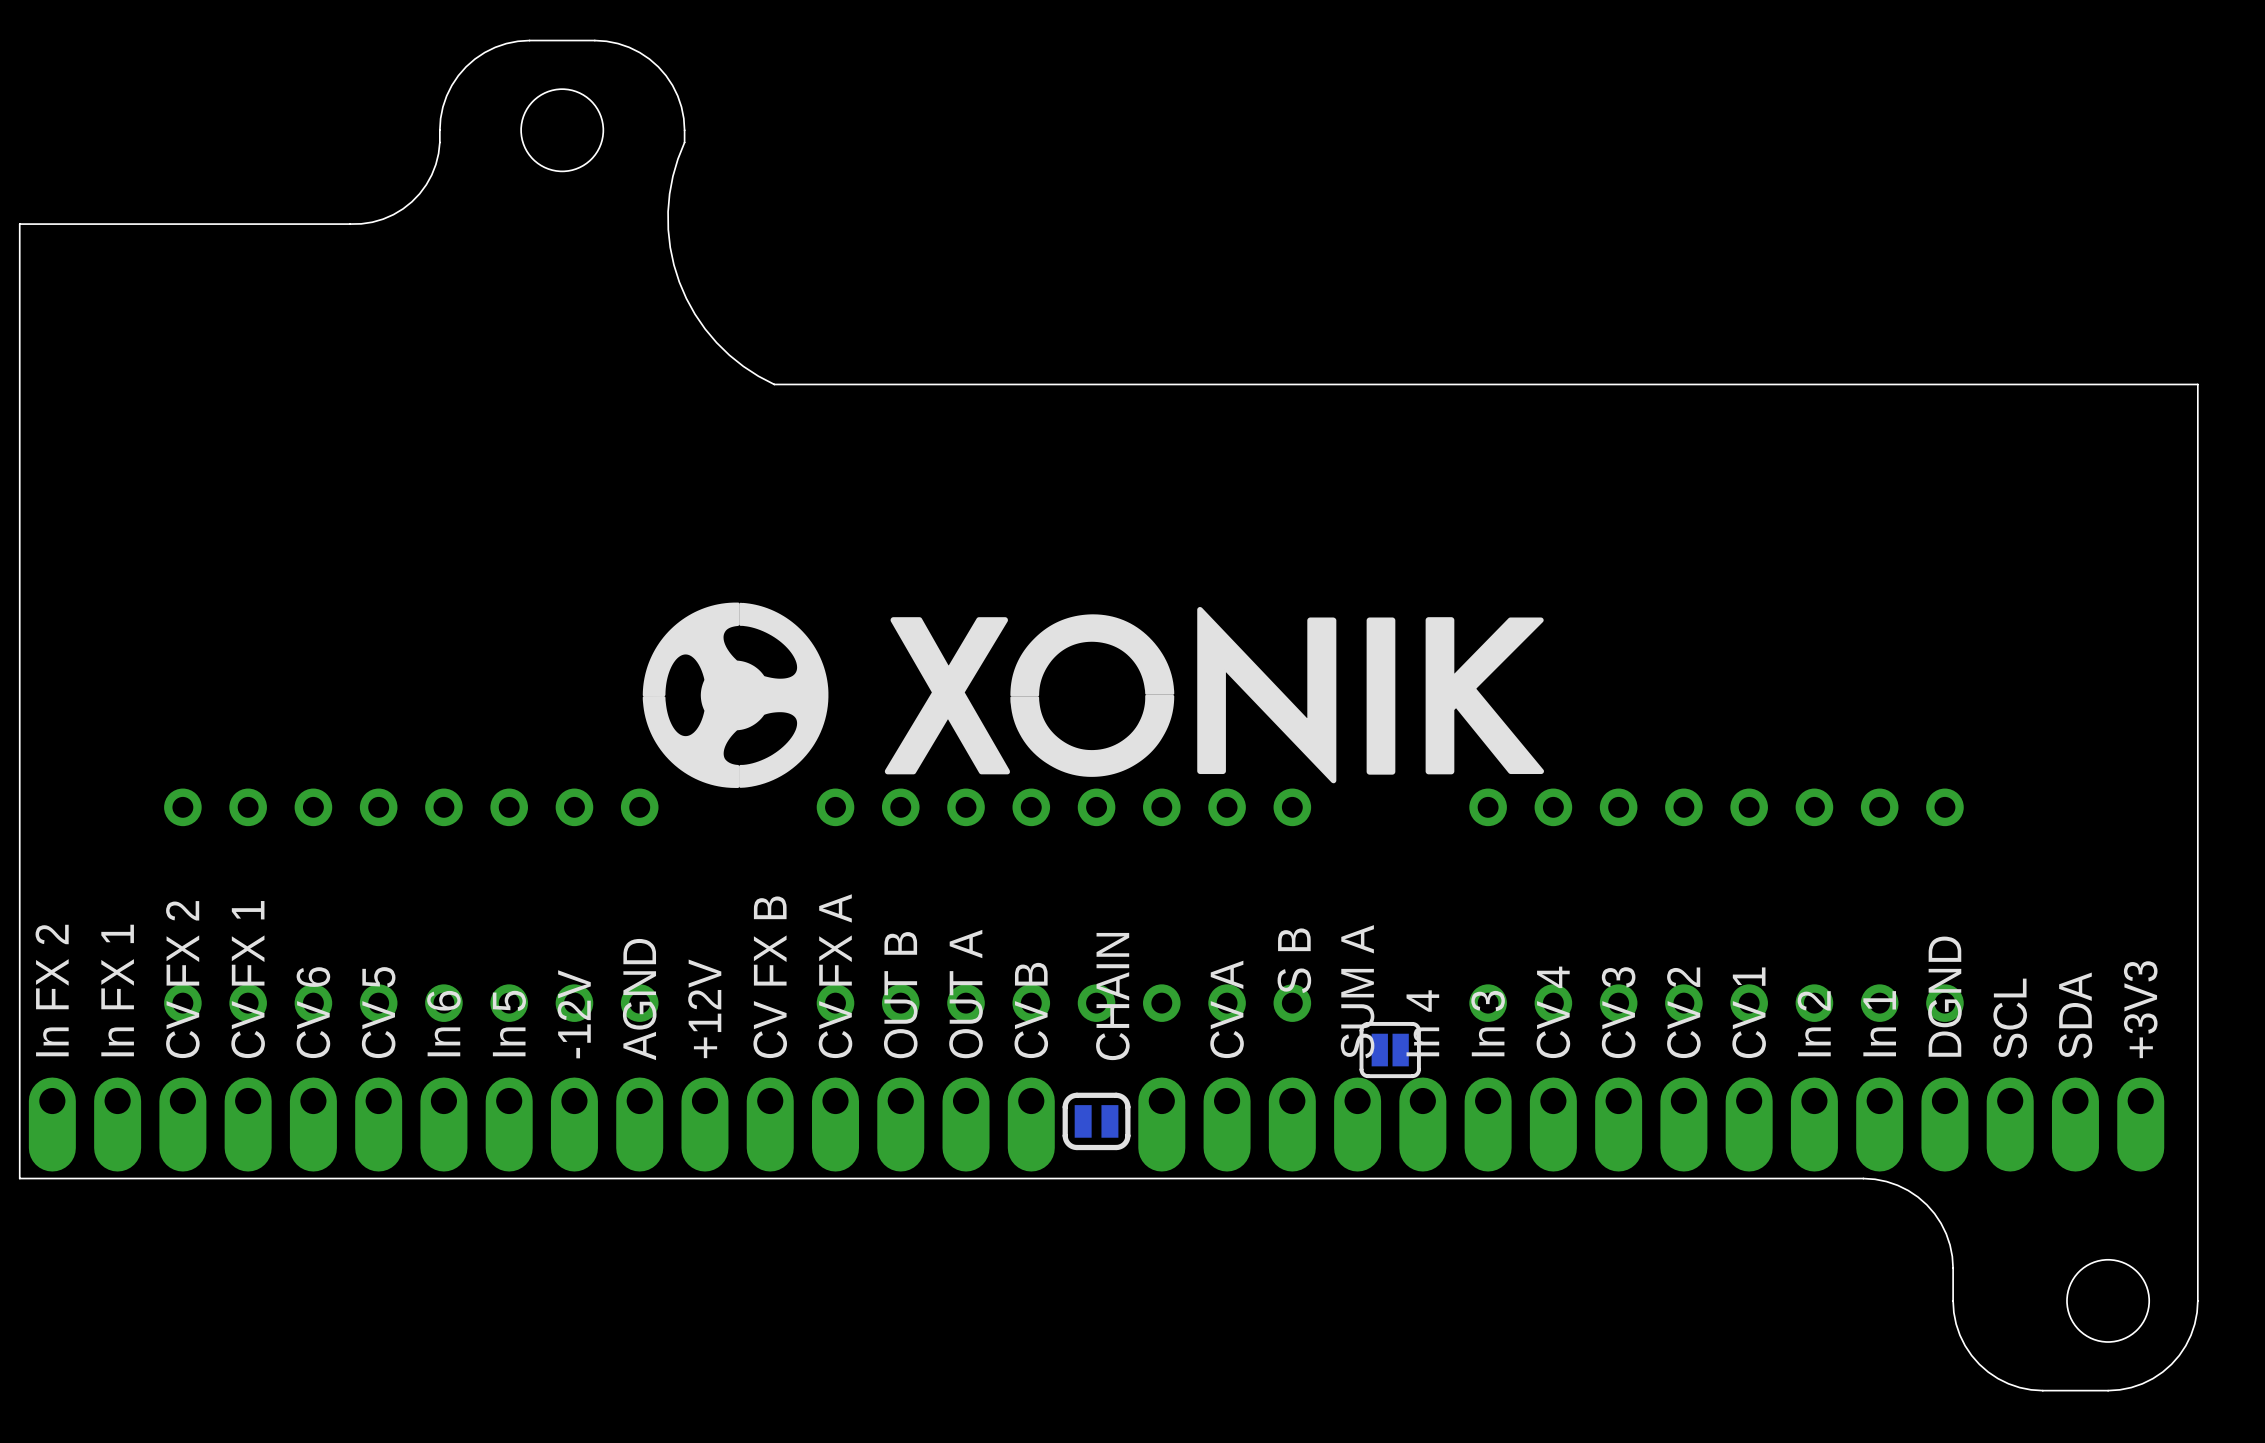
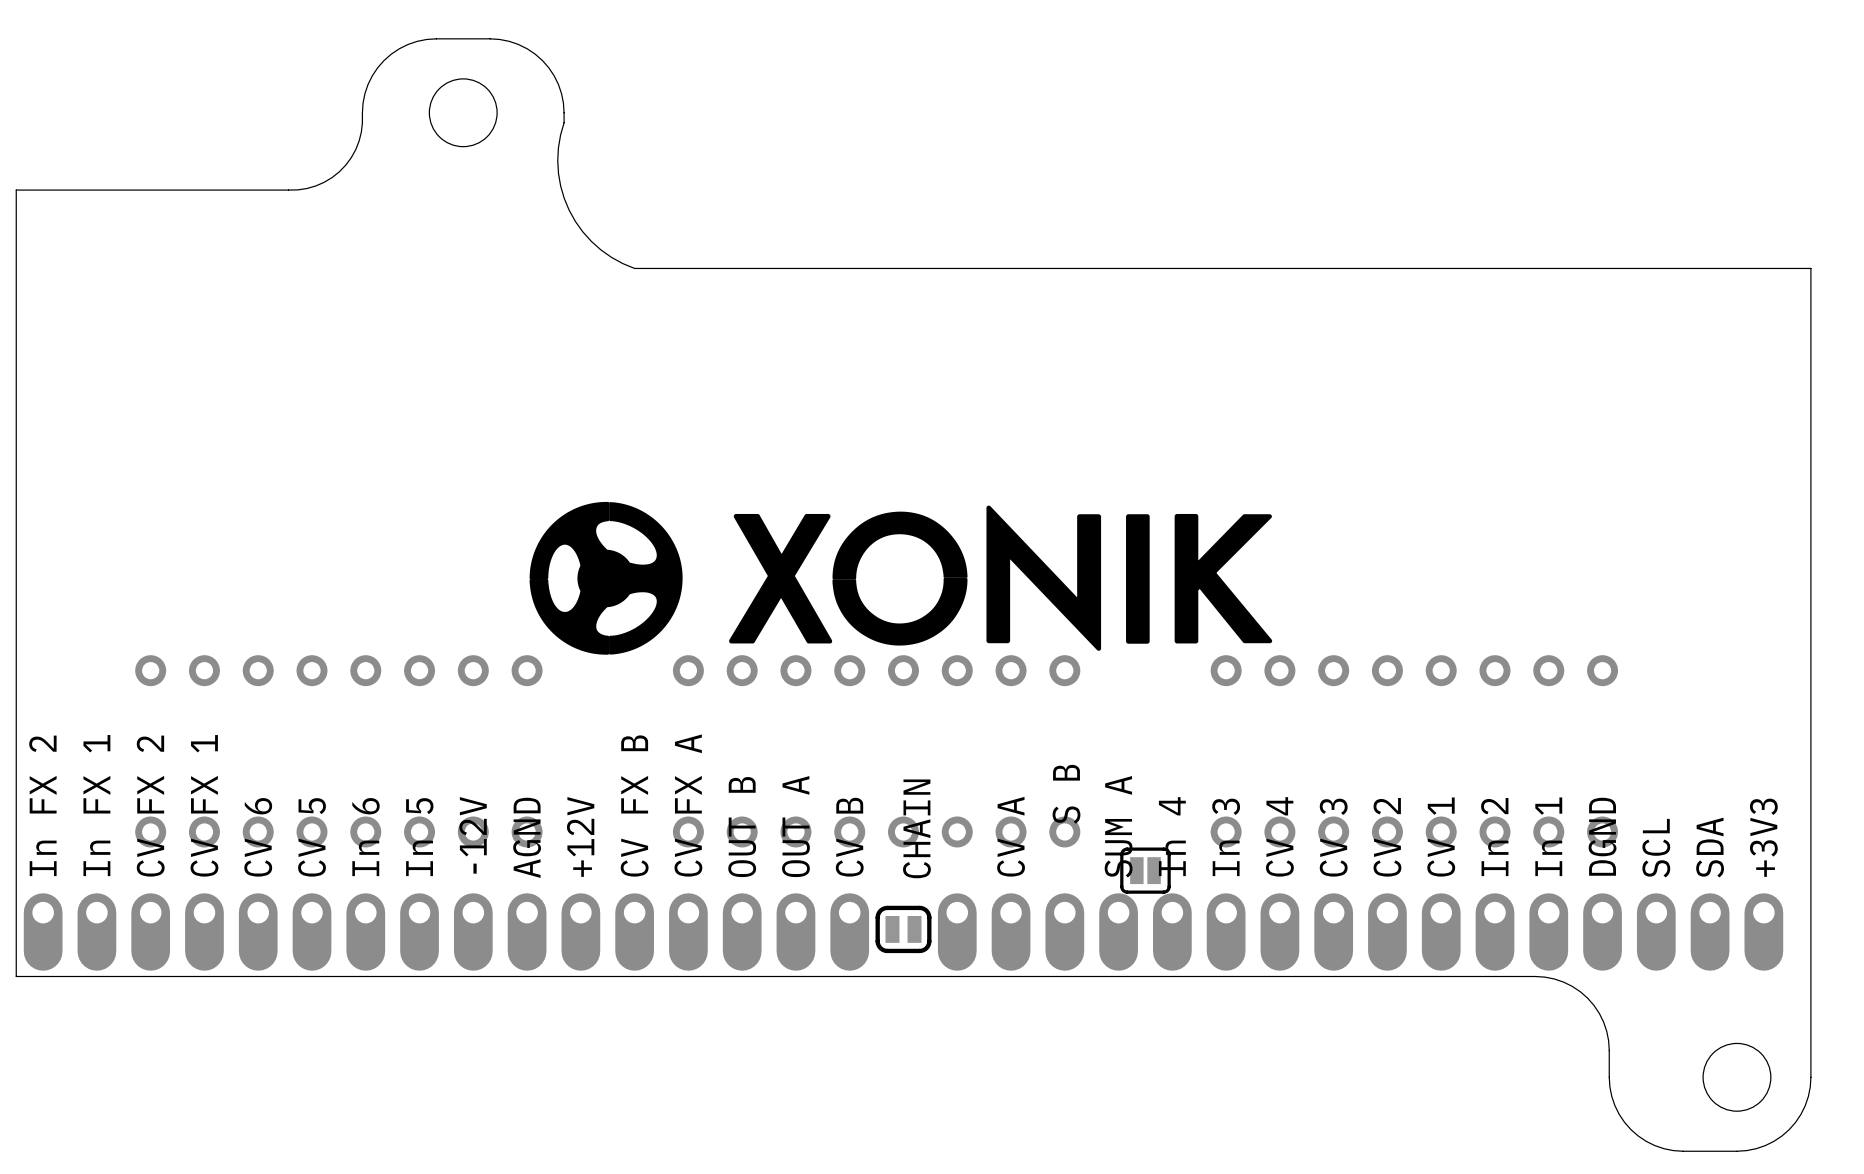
board edge: (684, 142) (672, 176) (668, 211) (670, 247) (679, 282) (695, 314) (716, 342) (743, 366) (774, 384) (2197, 384) -> (564, 122) (557, 160) (560, 186) (569, 210) (591, 241) (611, 257) (634, 268) (1810, 268) (1810, 322)

